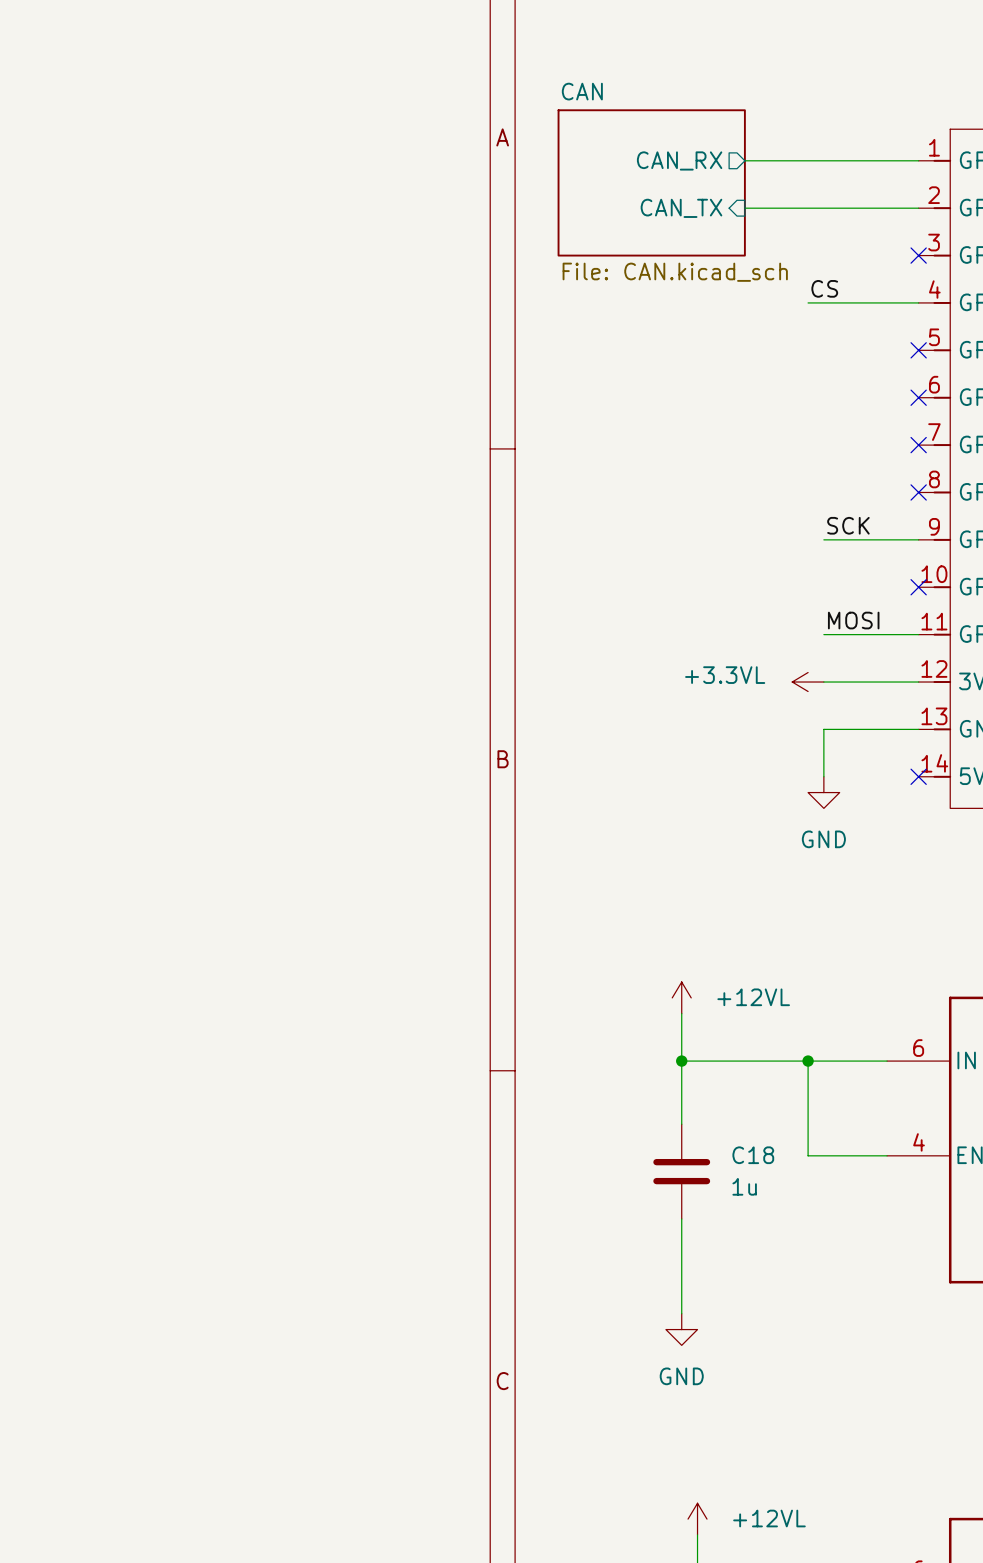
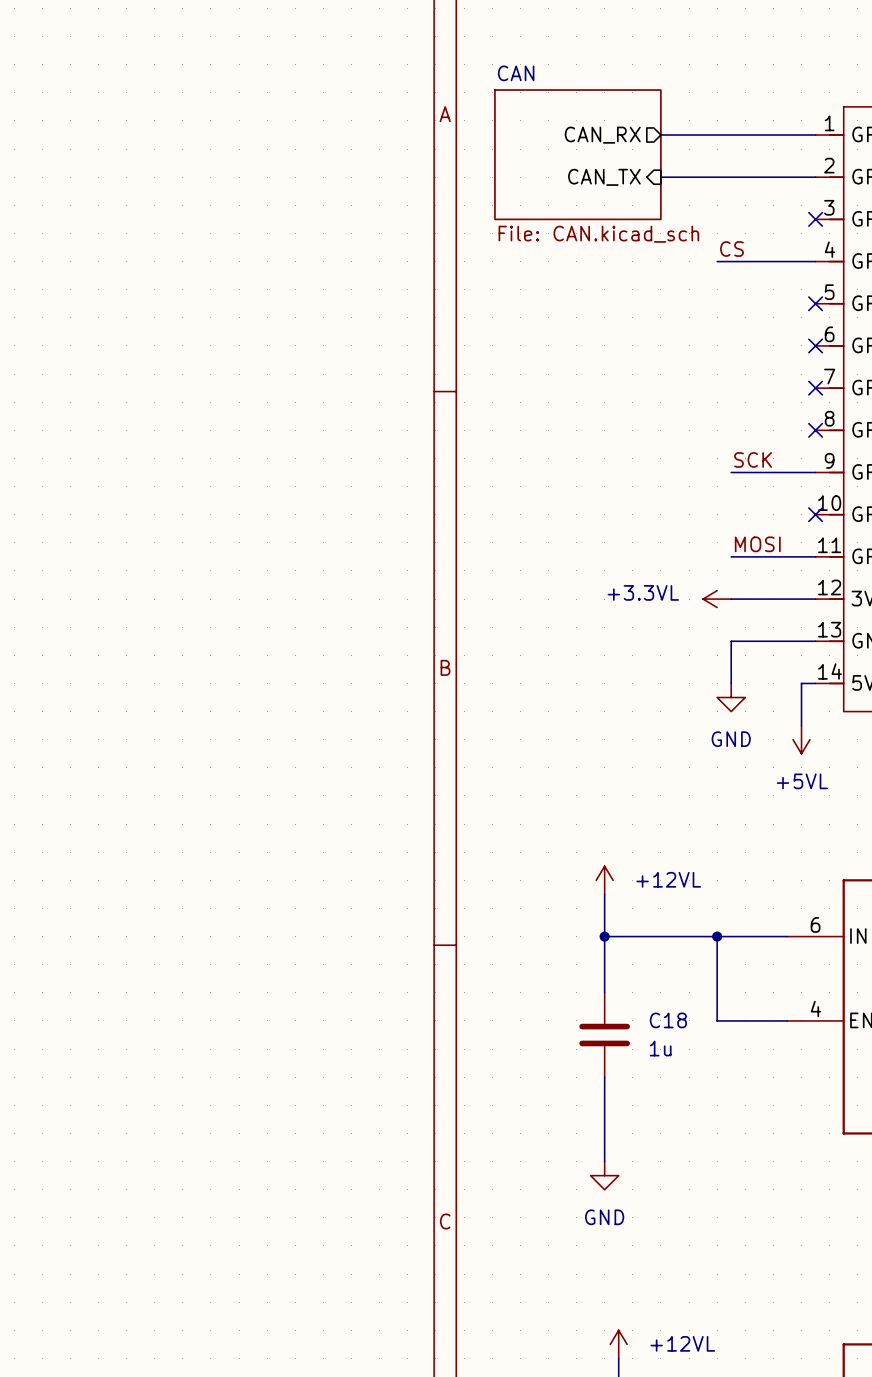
wire: none -> (815, 683) (801, 683) (801, 725)
no-connect mark: (918, 776) -> none
power symbol: none -> +5VL (801, 739)

